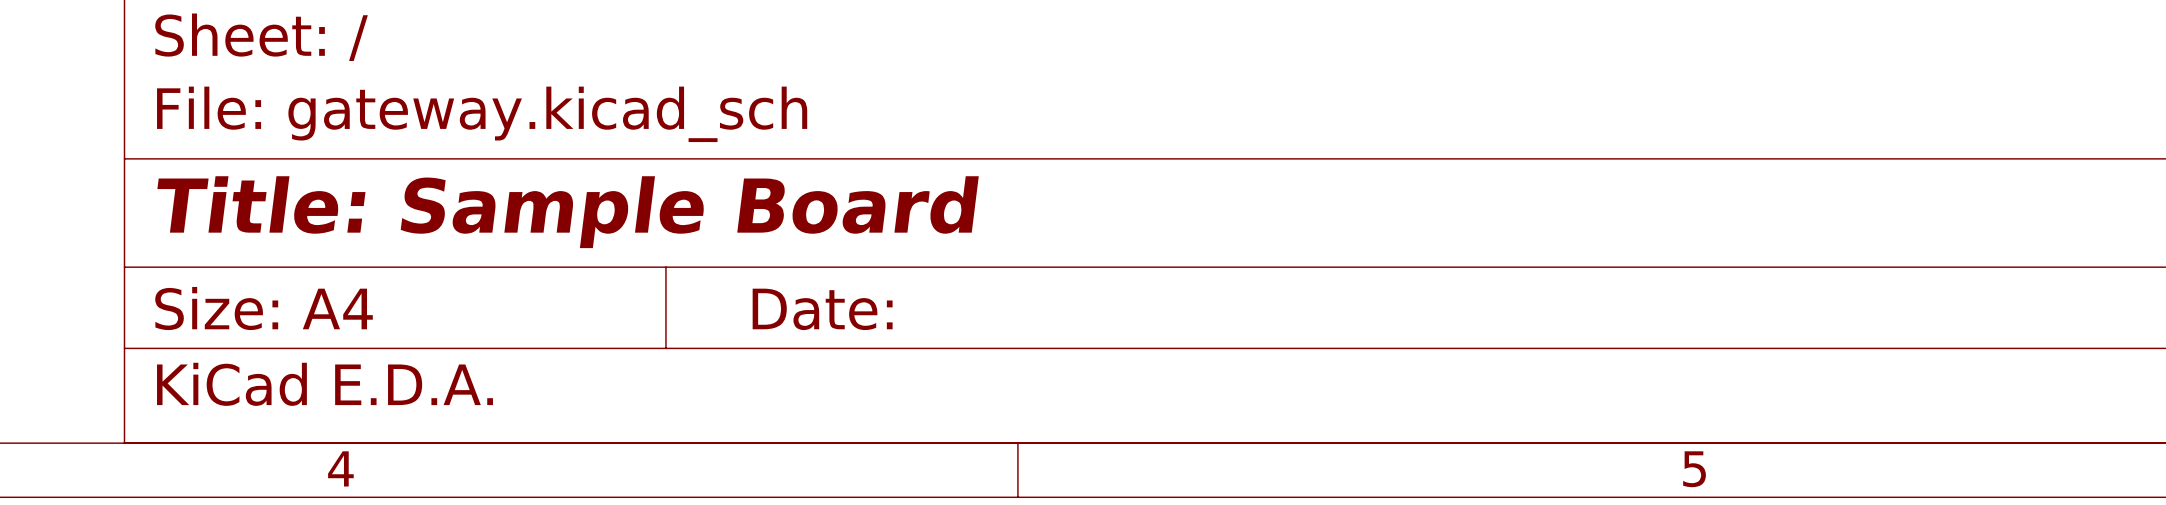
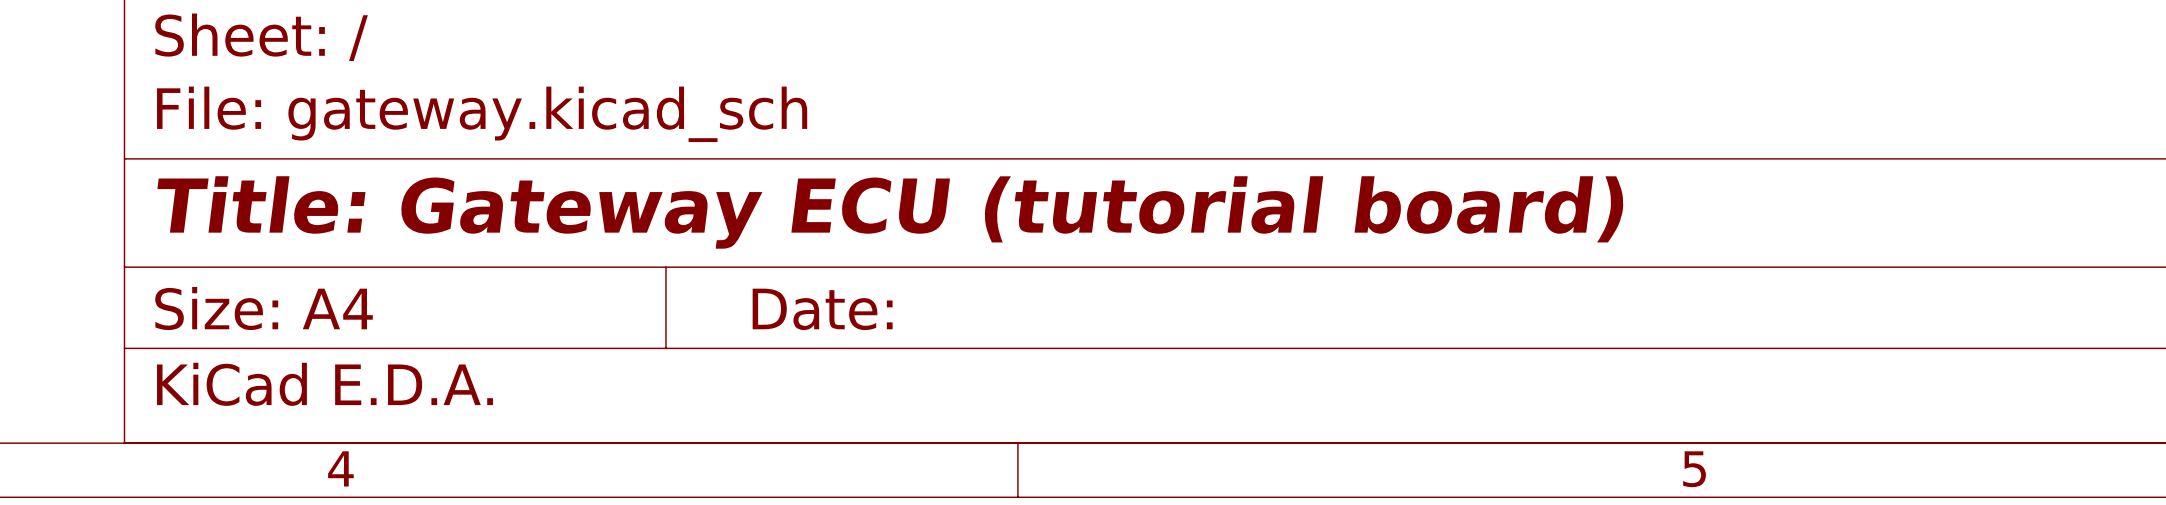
title block: Title: Sample Board (568, 212) -> Title: Gateway ECU (tutorial board) (890, 212)

